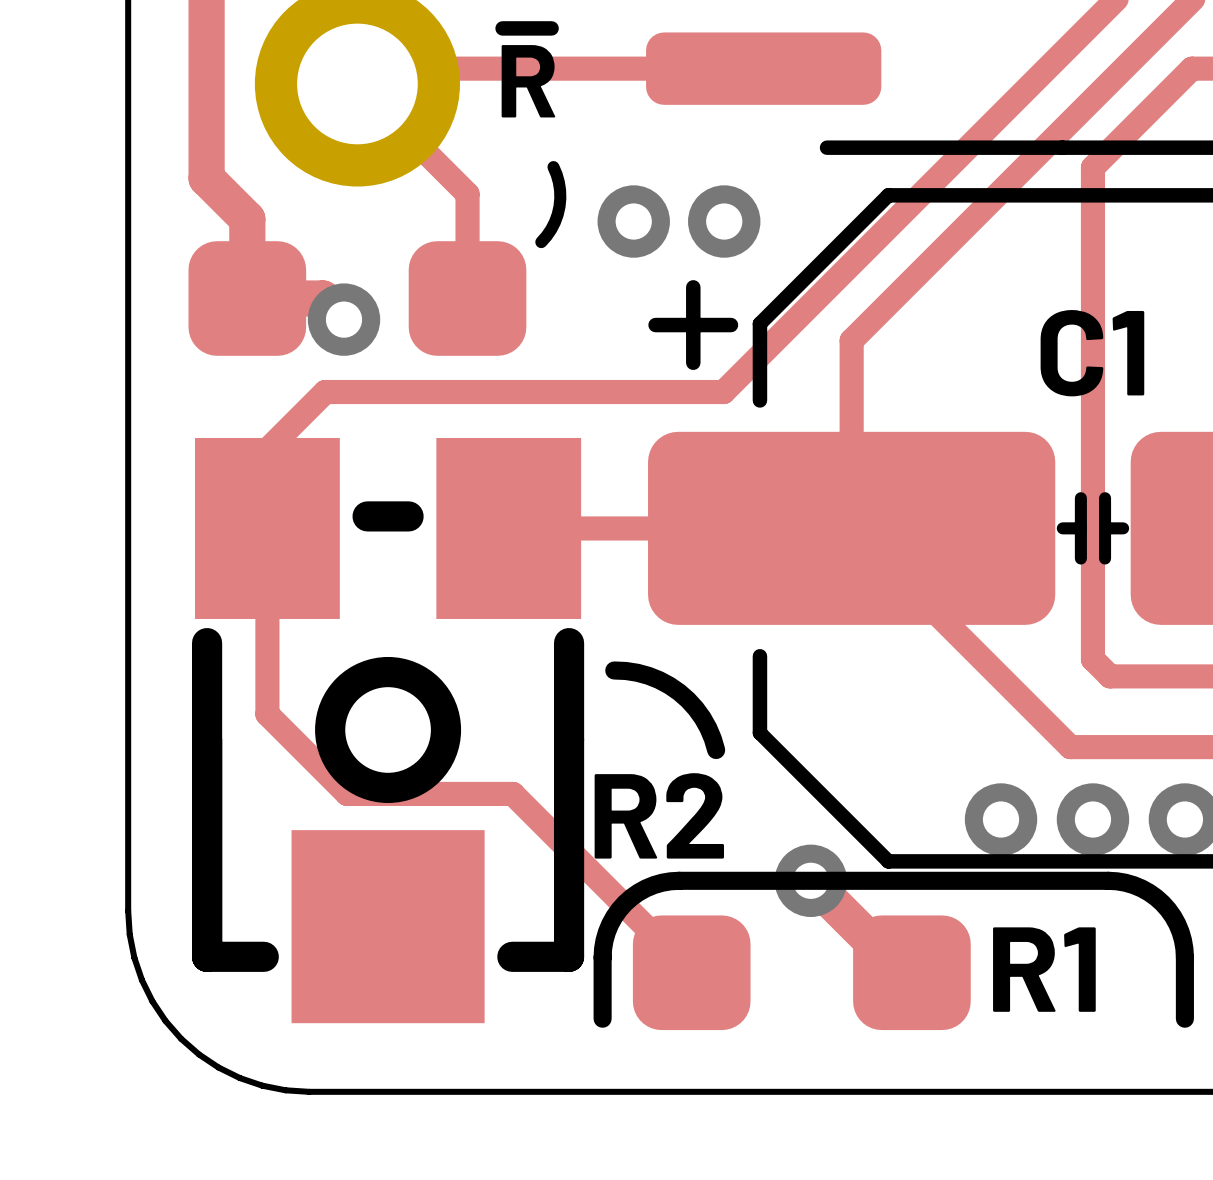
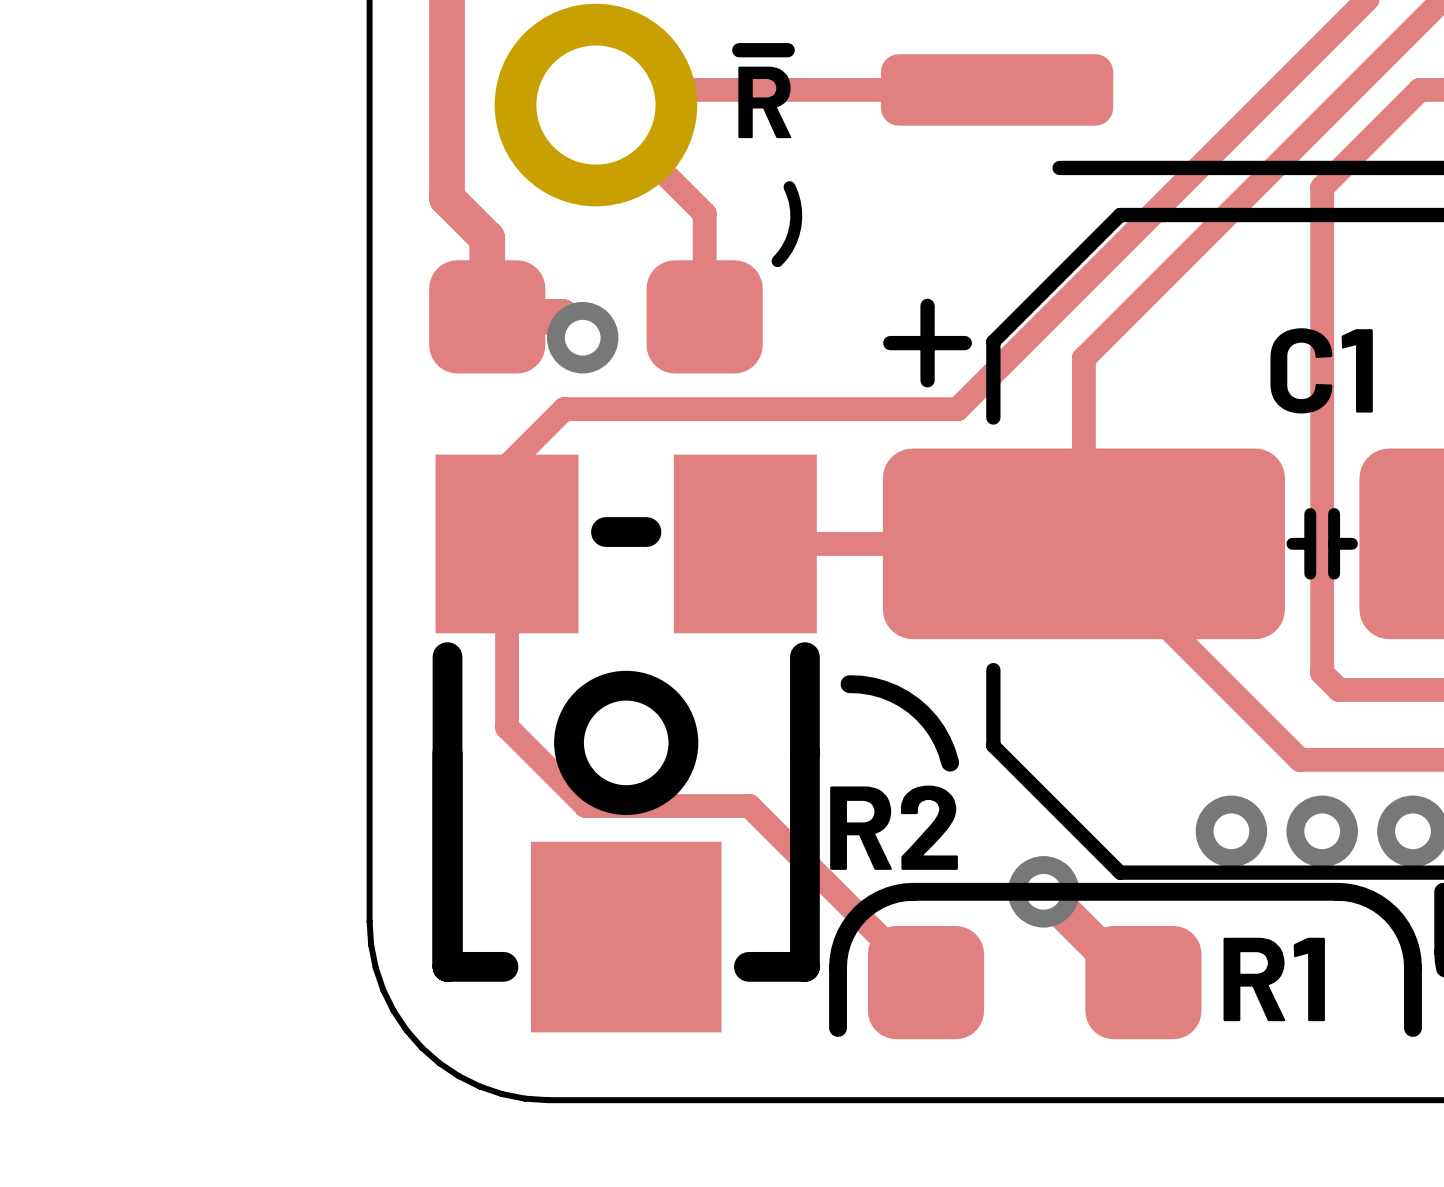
via: (633, 221) -> none
via: (724, 221) -> none

